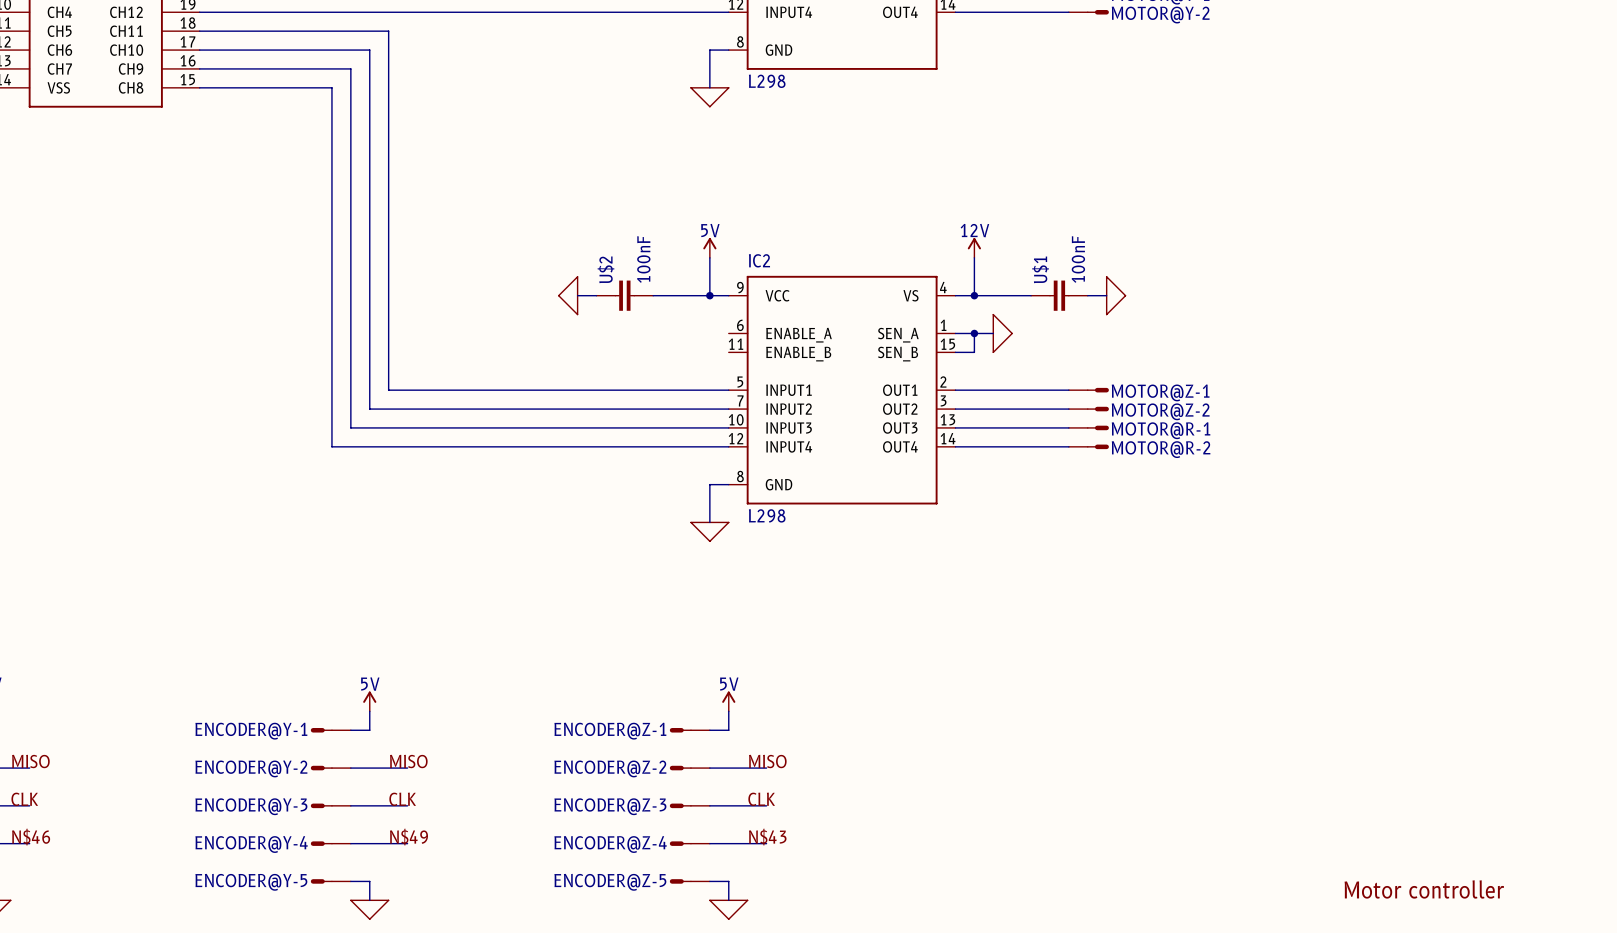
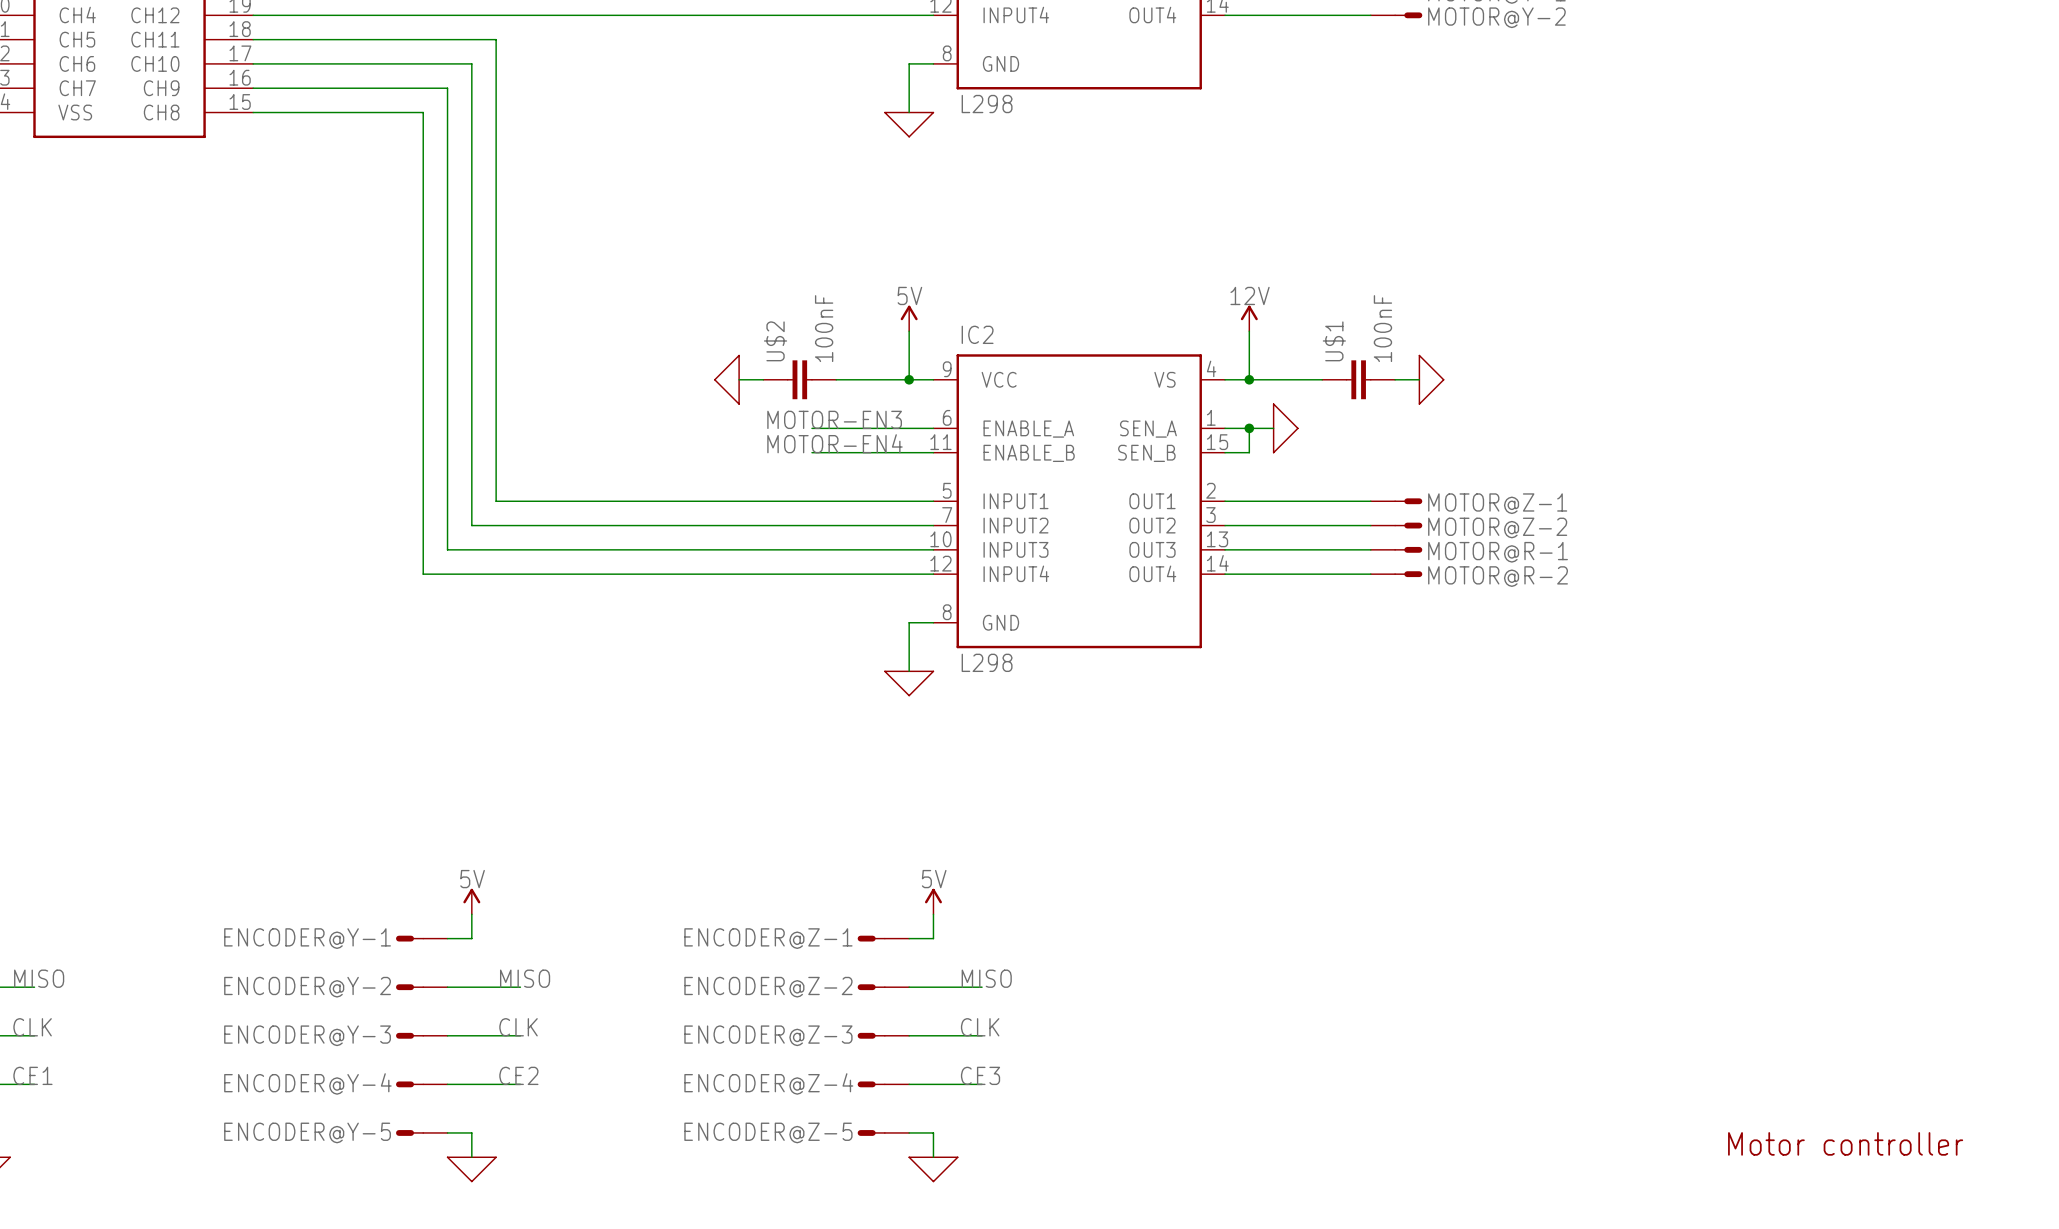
label: none -> MOTOR-EN3 (834, 419)
wire: none -> (811, 428) (933, 428)
label: none -> MOTOR-EN4 (834, 443)
wire: none -> (811, 452) (933, 452)
label: N$46 (31, 837) -> CE1 (32, 1075)
label: N$49 (408, 837) -> CE2 (518, 1075)
label: N$43 (767, 837) -> CE3 (980, 1075)

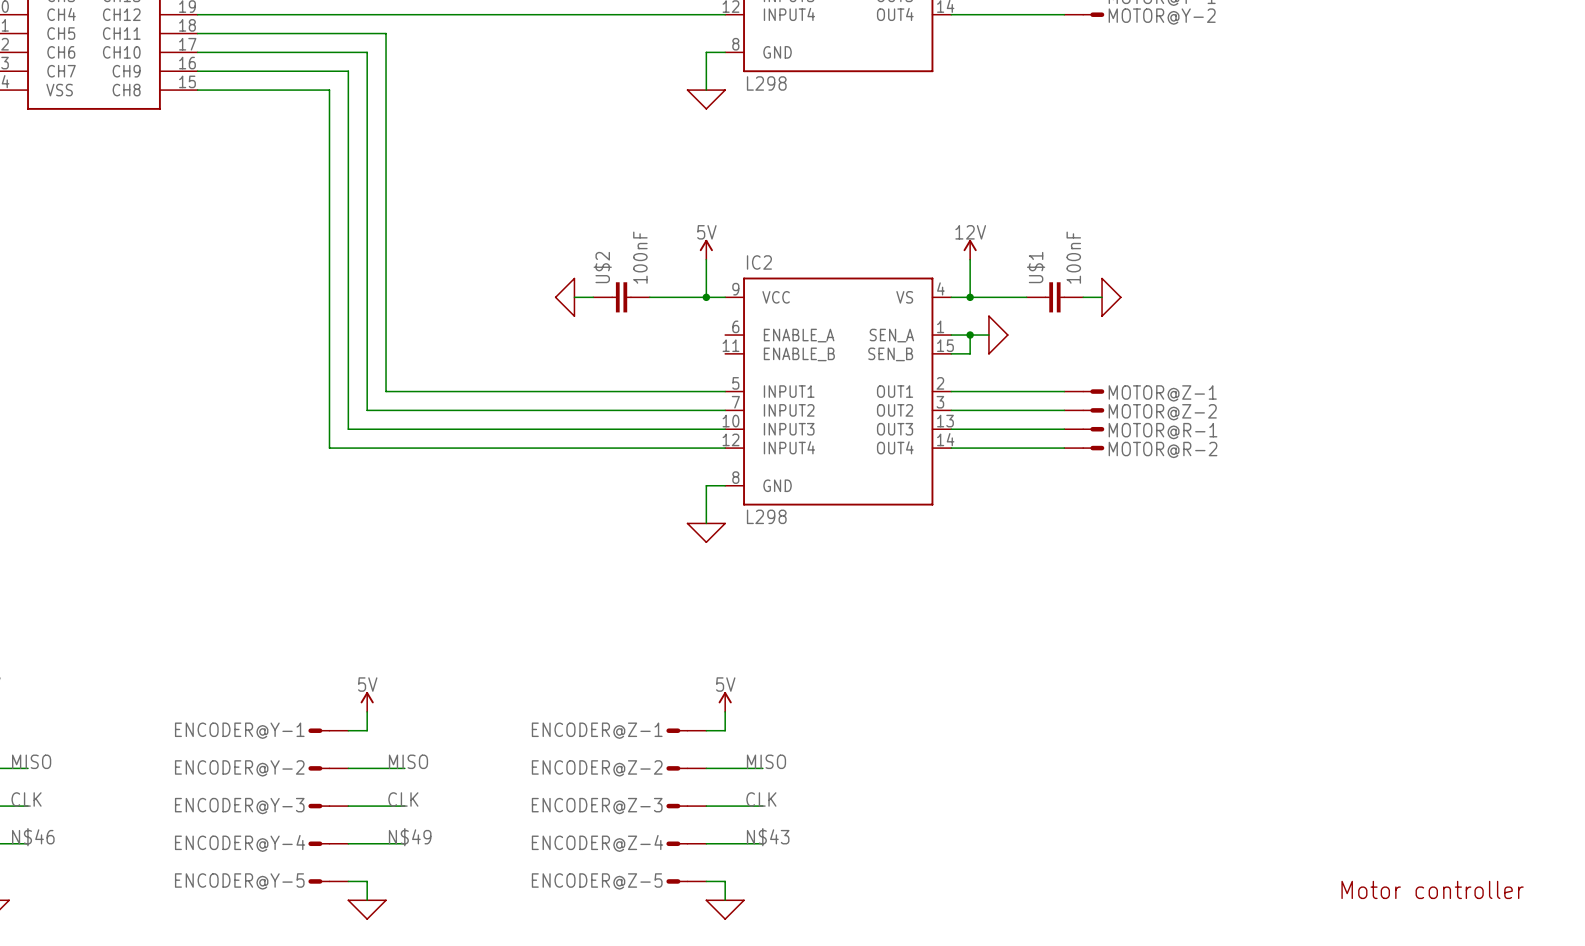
label: MOTOR-EN3 (834, 419) -> none
wire: (811, 428) (933, 428) -> none
label: MOTOR-EN4 (834, 443) -> none
wire: (811, 452) (933, 452) -> none
label: CE1 (32, 1075) -> N$46 (33, 837)
label: CE2 (518, 1075) -> N$49 (410, 837)
label: CE3 (980, 1075) -> N$43 (768, 837)

